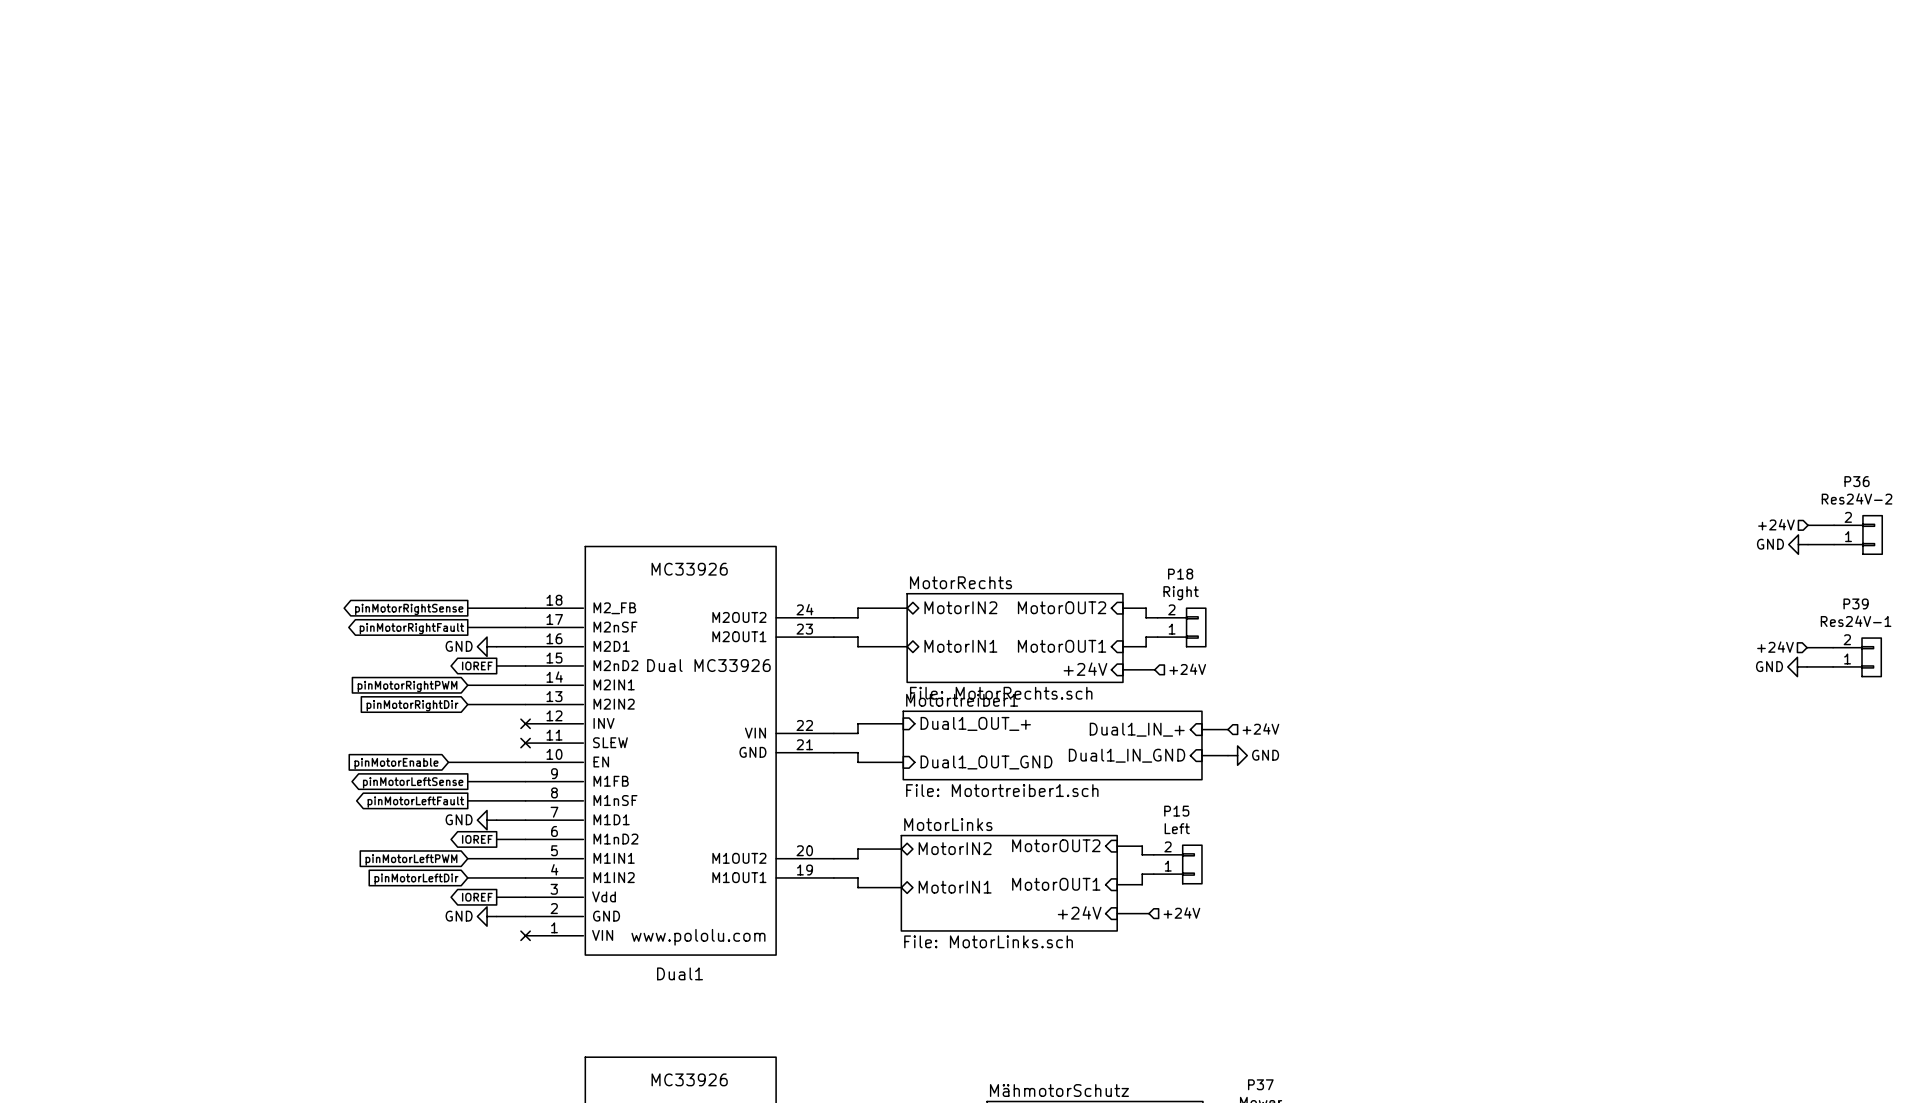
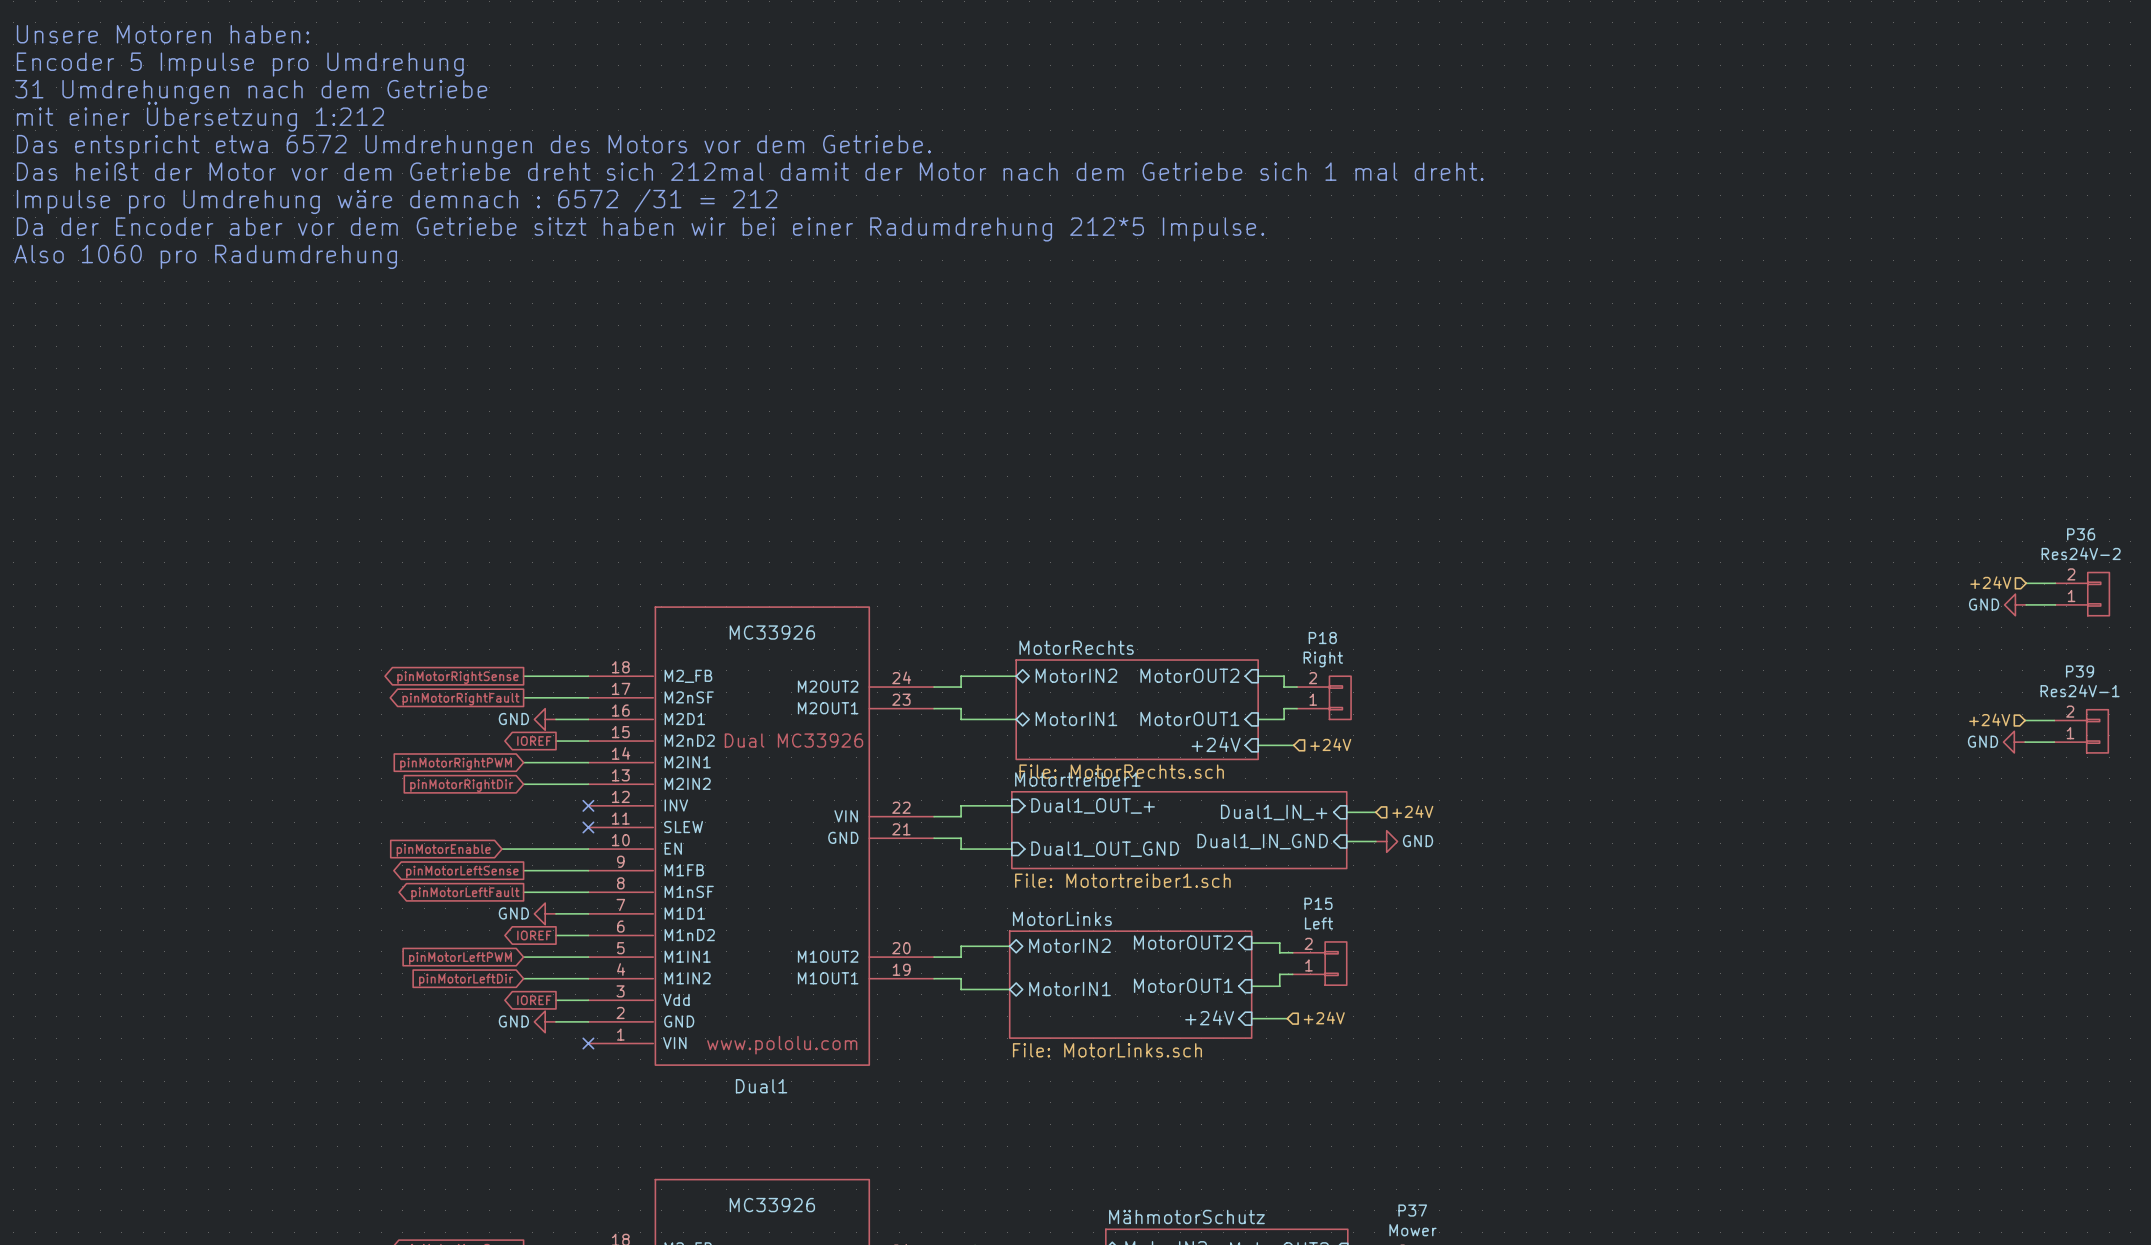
text: none -> Unsere Motoren haben: (163, 34)
text: none -> Encoder 5 Impulse pro Umdrehung (240, 64)
text: none -> 31 Umdrehungen nach dem Getriebe (251, 92)
text: none -> mit einer Übersetzung 1:212 (200, 116)
text: none -> Das entspricht etwa 6572 Umdrehungen des Motors vor dem Getriebe. (473, 146)
text: none -> Das heißt der Motor vor dem Getriebe dreht sich 212mal damit der Motor nach dem Getriebe sich 1 mal dreht. (750, 171)
text: none -> Impulse pro Umdrehung wäre demnach : 6572 /31 = 212 (397, 201)
text: none -> Da der Encoder aber vor dem Getriebe sitzt haben wir bei einer Radumdrehung 212*5 Impulse. (640, 229)
text: none -> Also 1060 pro Radumdrehung (205, 256)

